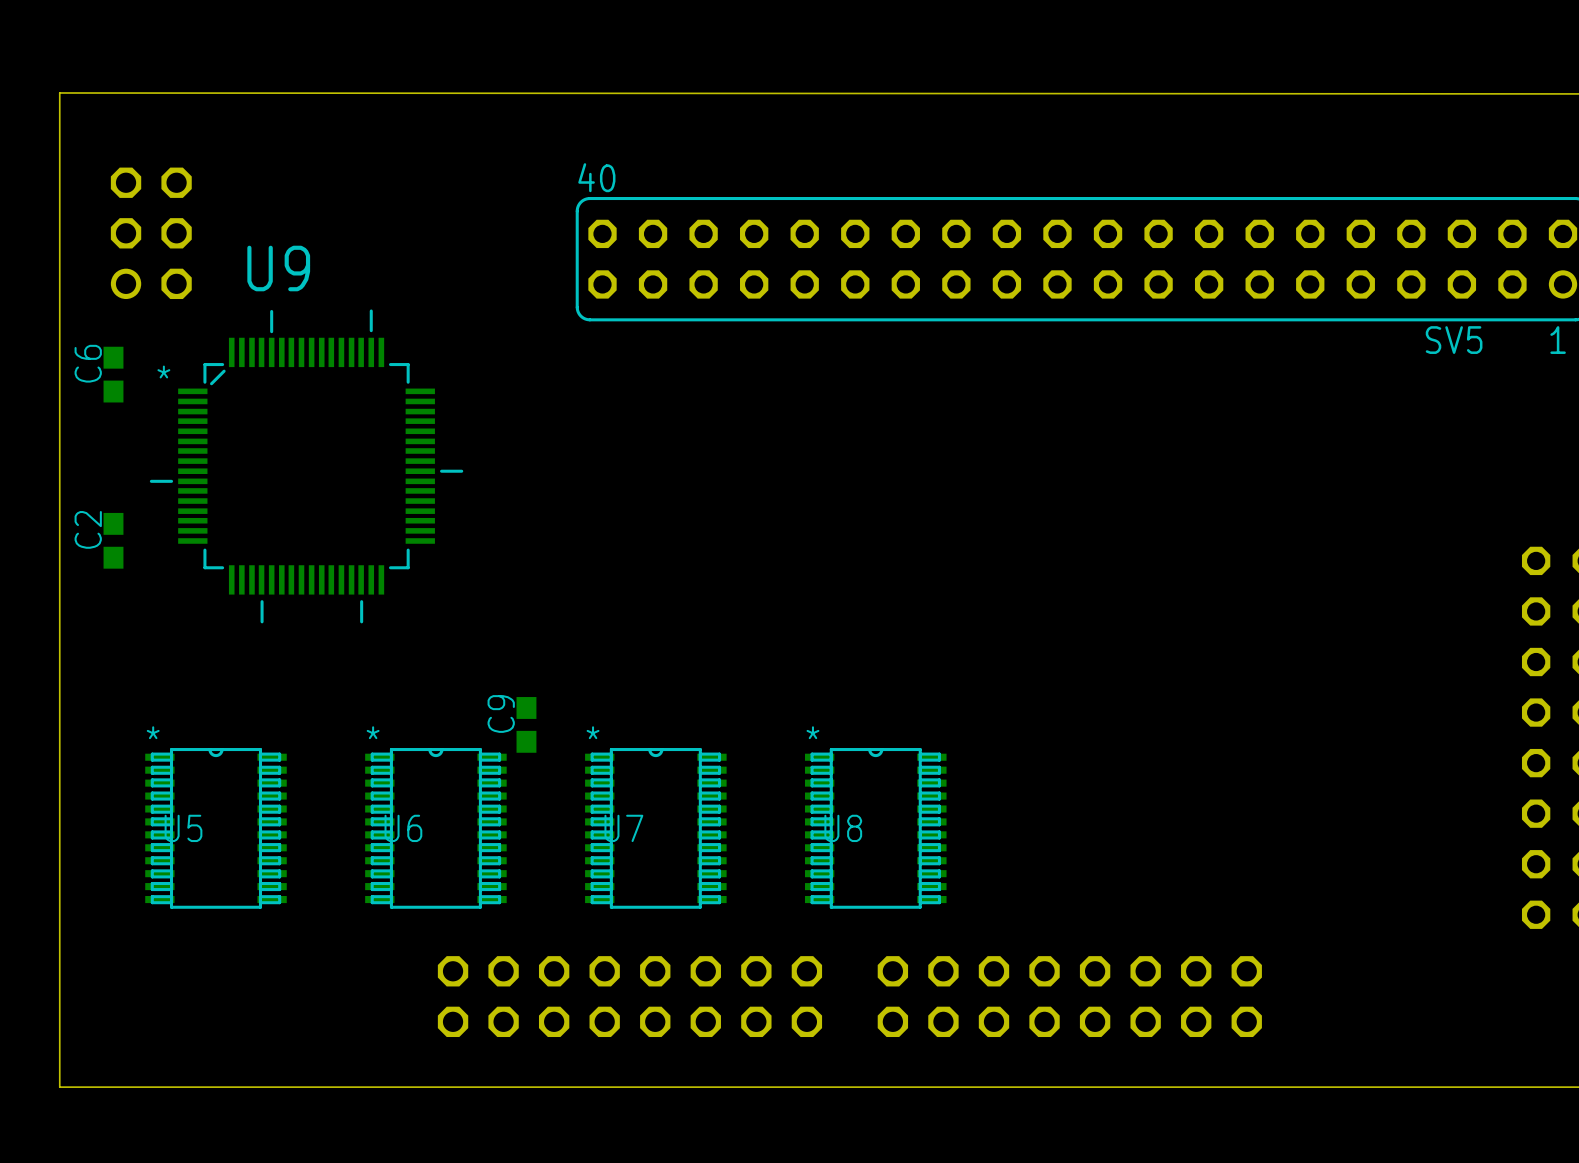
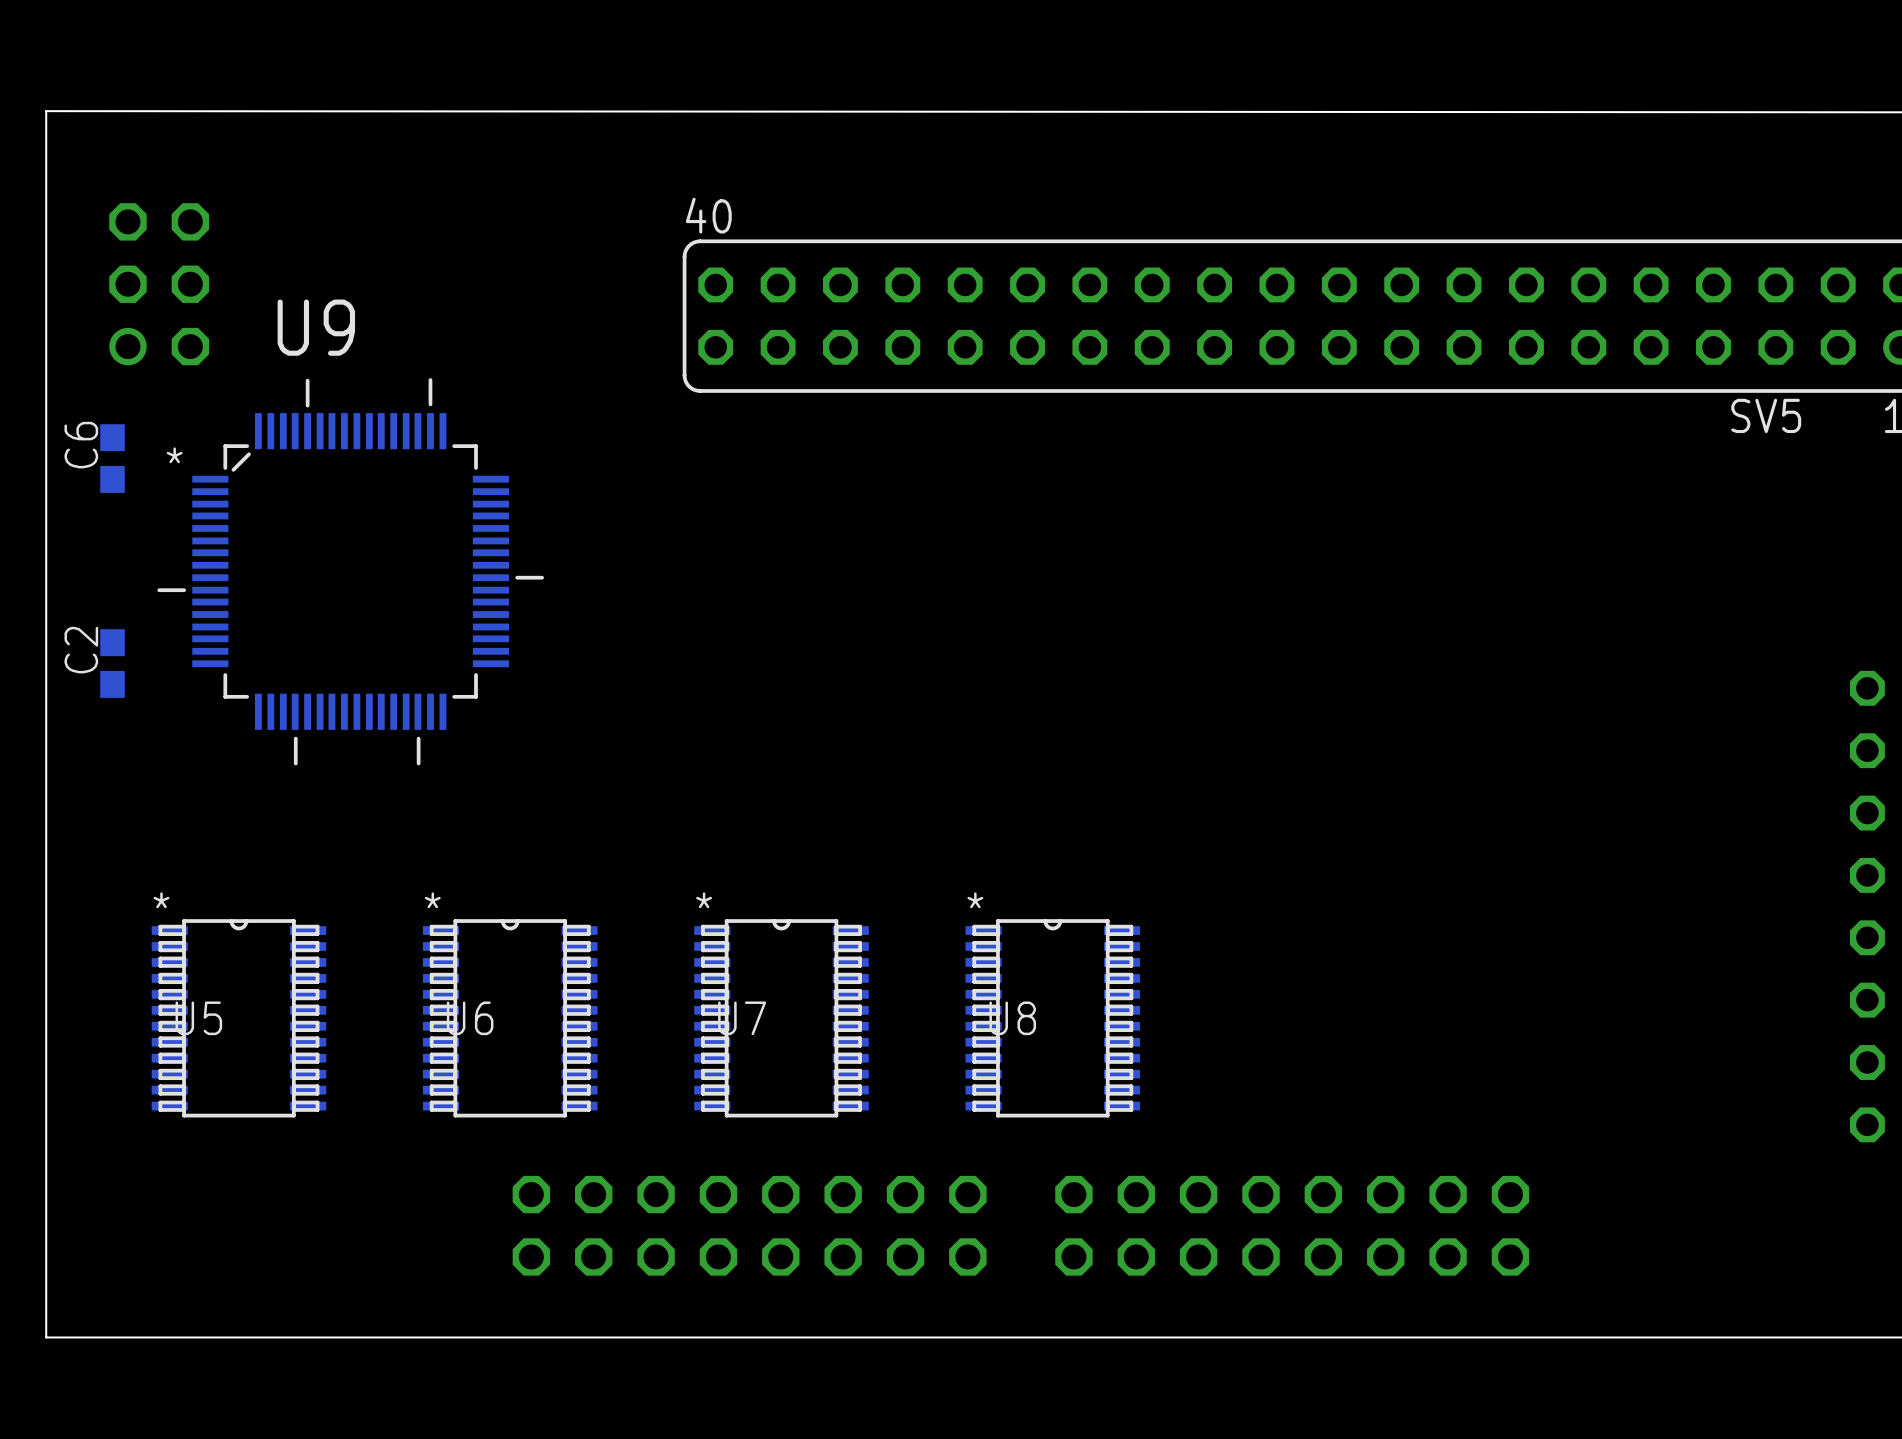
C9: (526, 724) -> none

